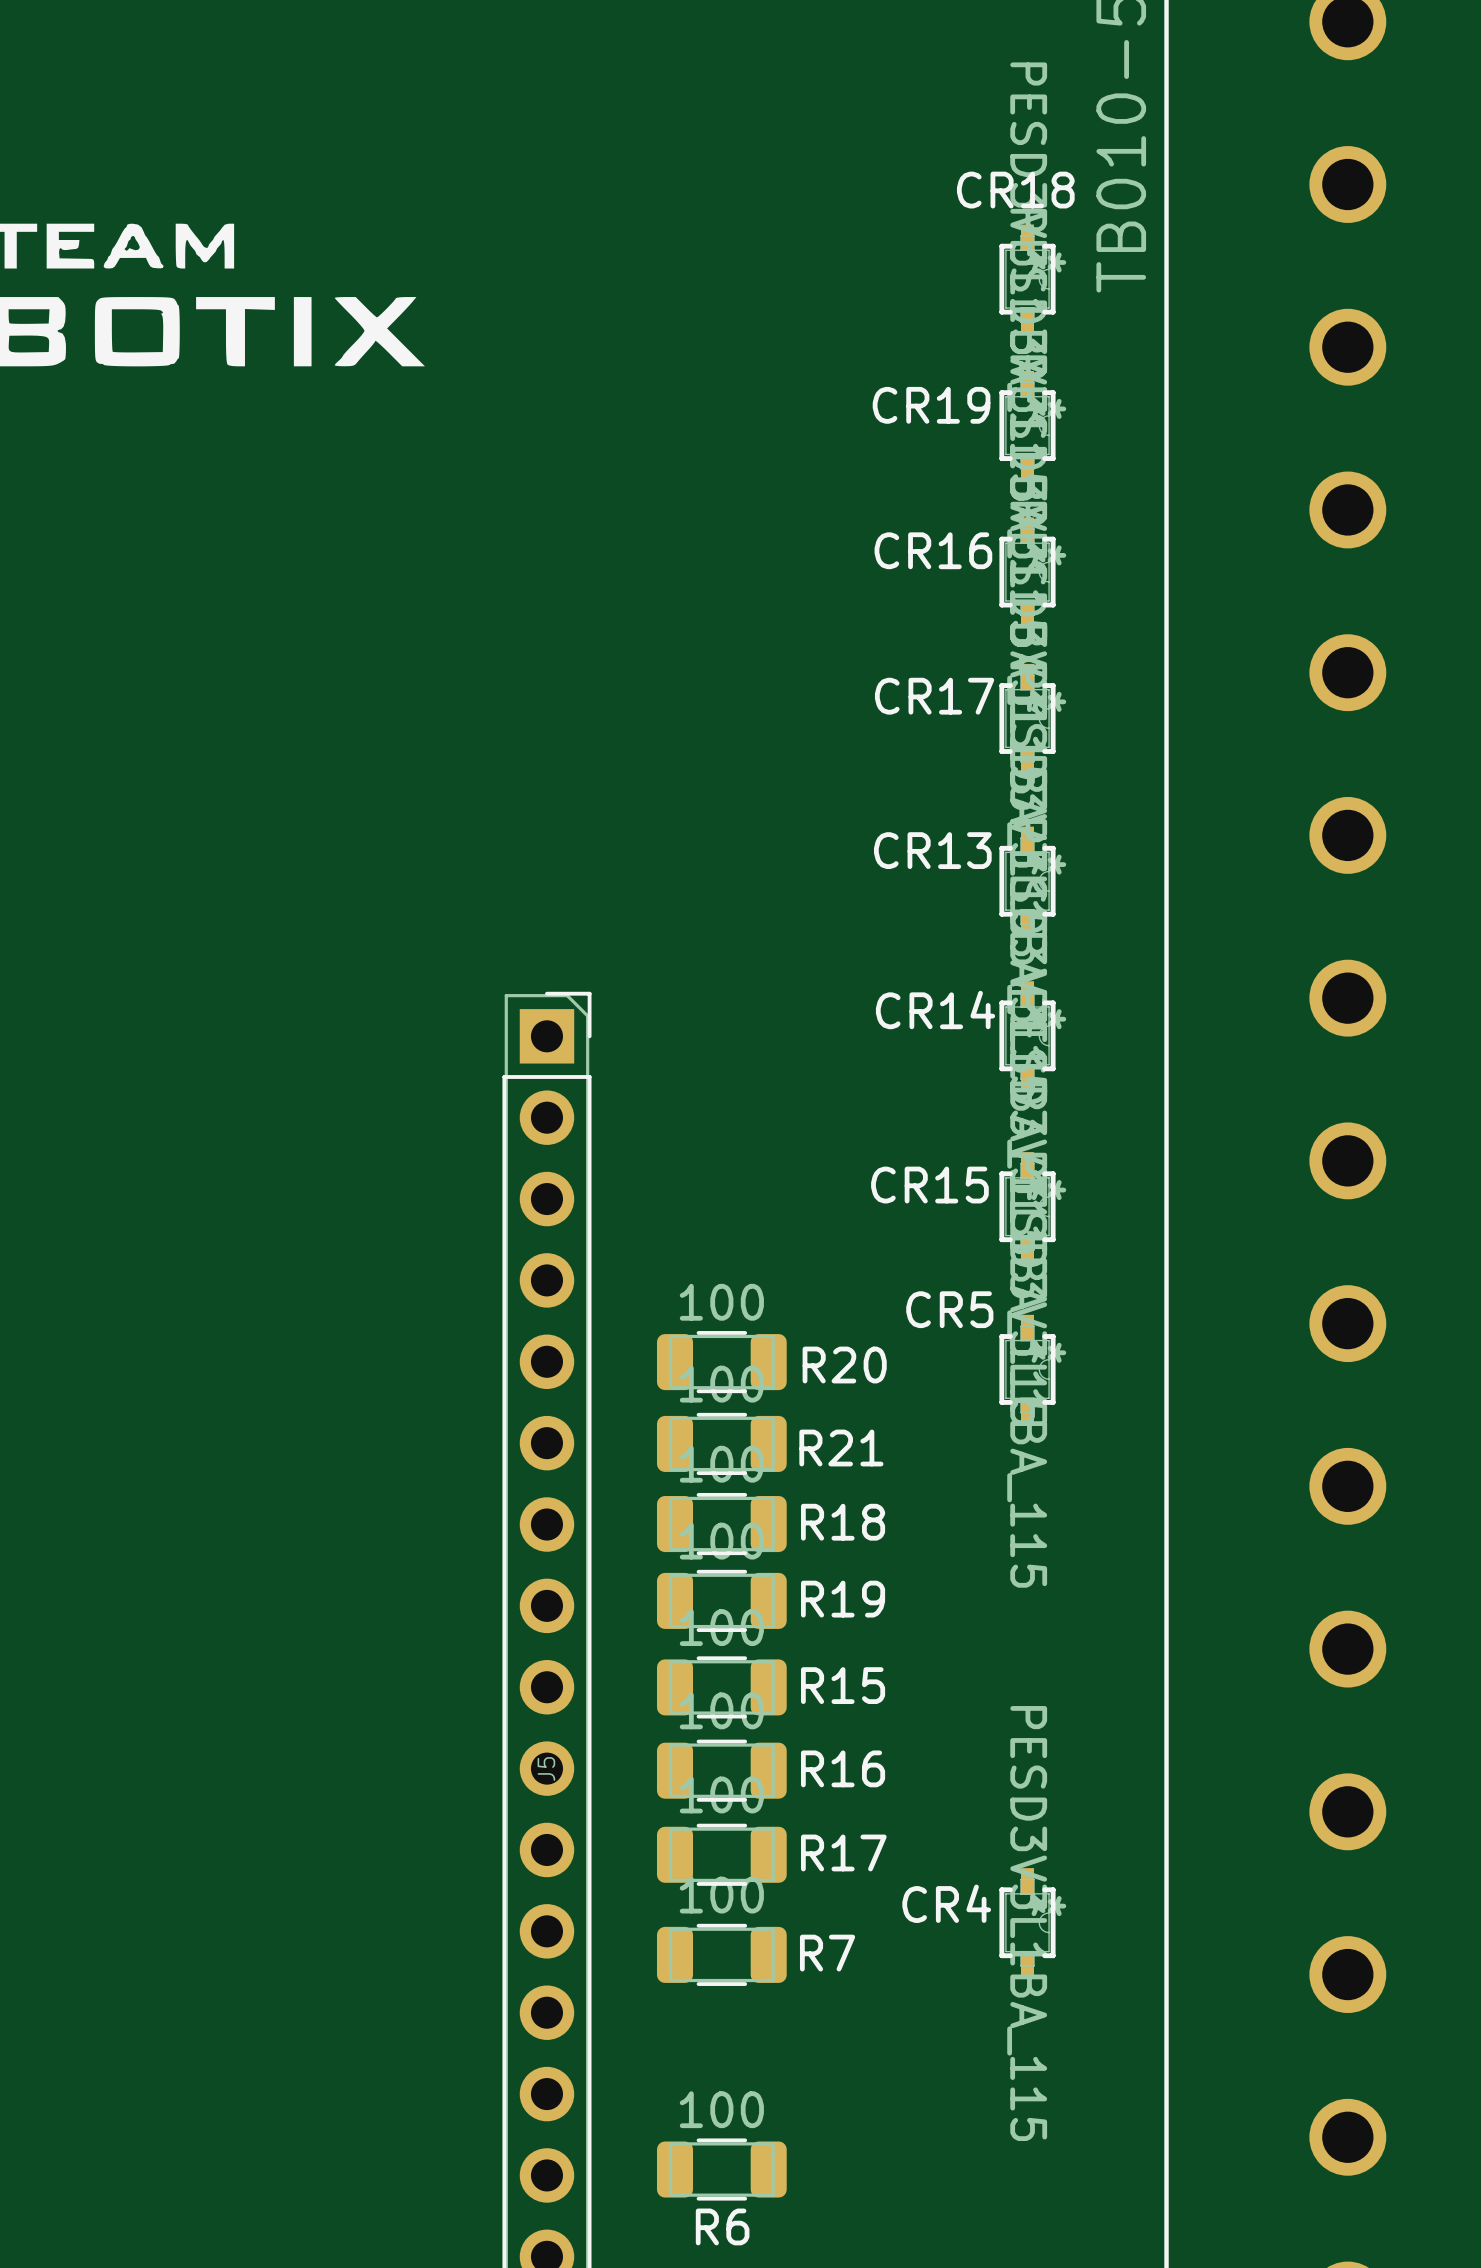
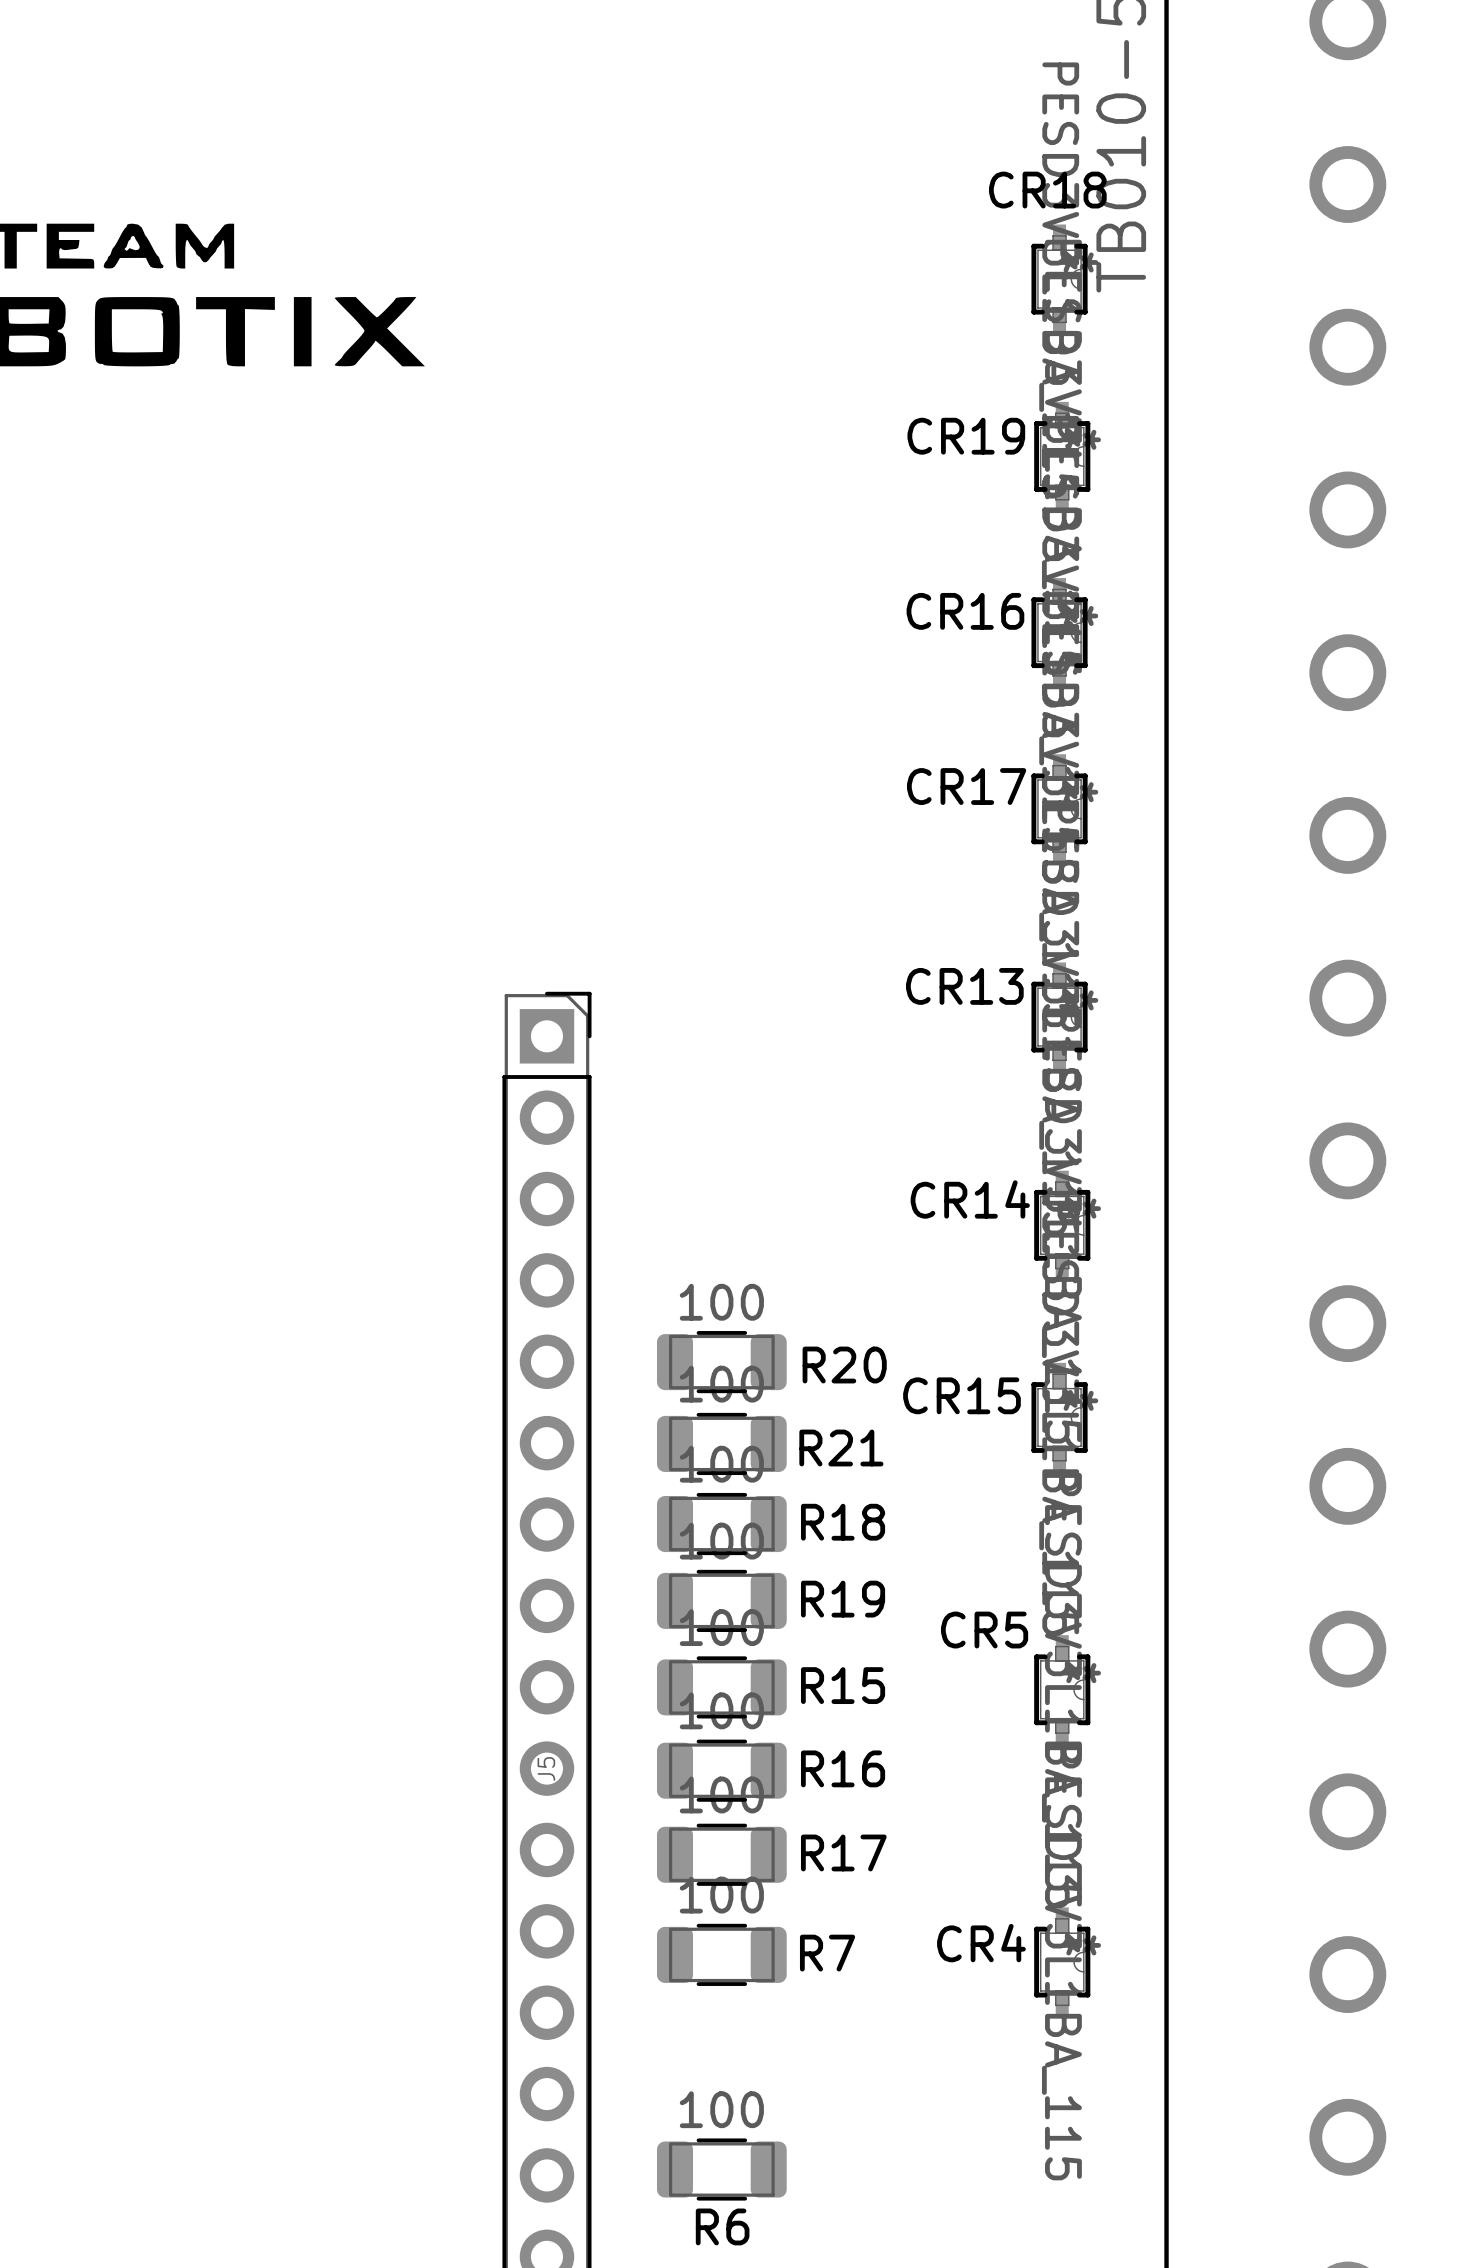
CR18 position: (1027, 279) -> (1059, 279)
CR19 position: (1027, 425) -> (1062, 456)
CR16 position: (1027, 572) -> (1059, 632)
CR17 position: (1027, 718) -> (1059, 808)
CR13 position: (1027, 881) -> (1059, 1017)
CR14 position: (1027, 1035) -> (1062, 1225)
CR15 position: (1027, 1206) -> (1059, 1417)
CR5 position: (1027, 1369) -> (1062, 1689)
CR4 position: (1027, 1922) -> (1062, 1962)

